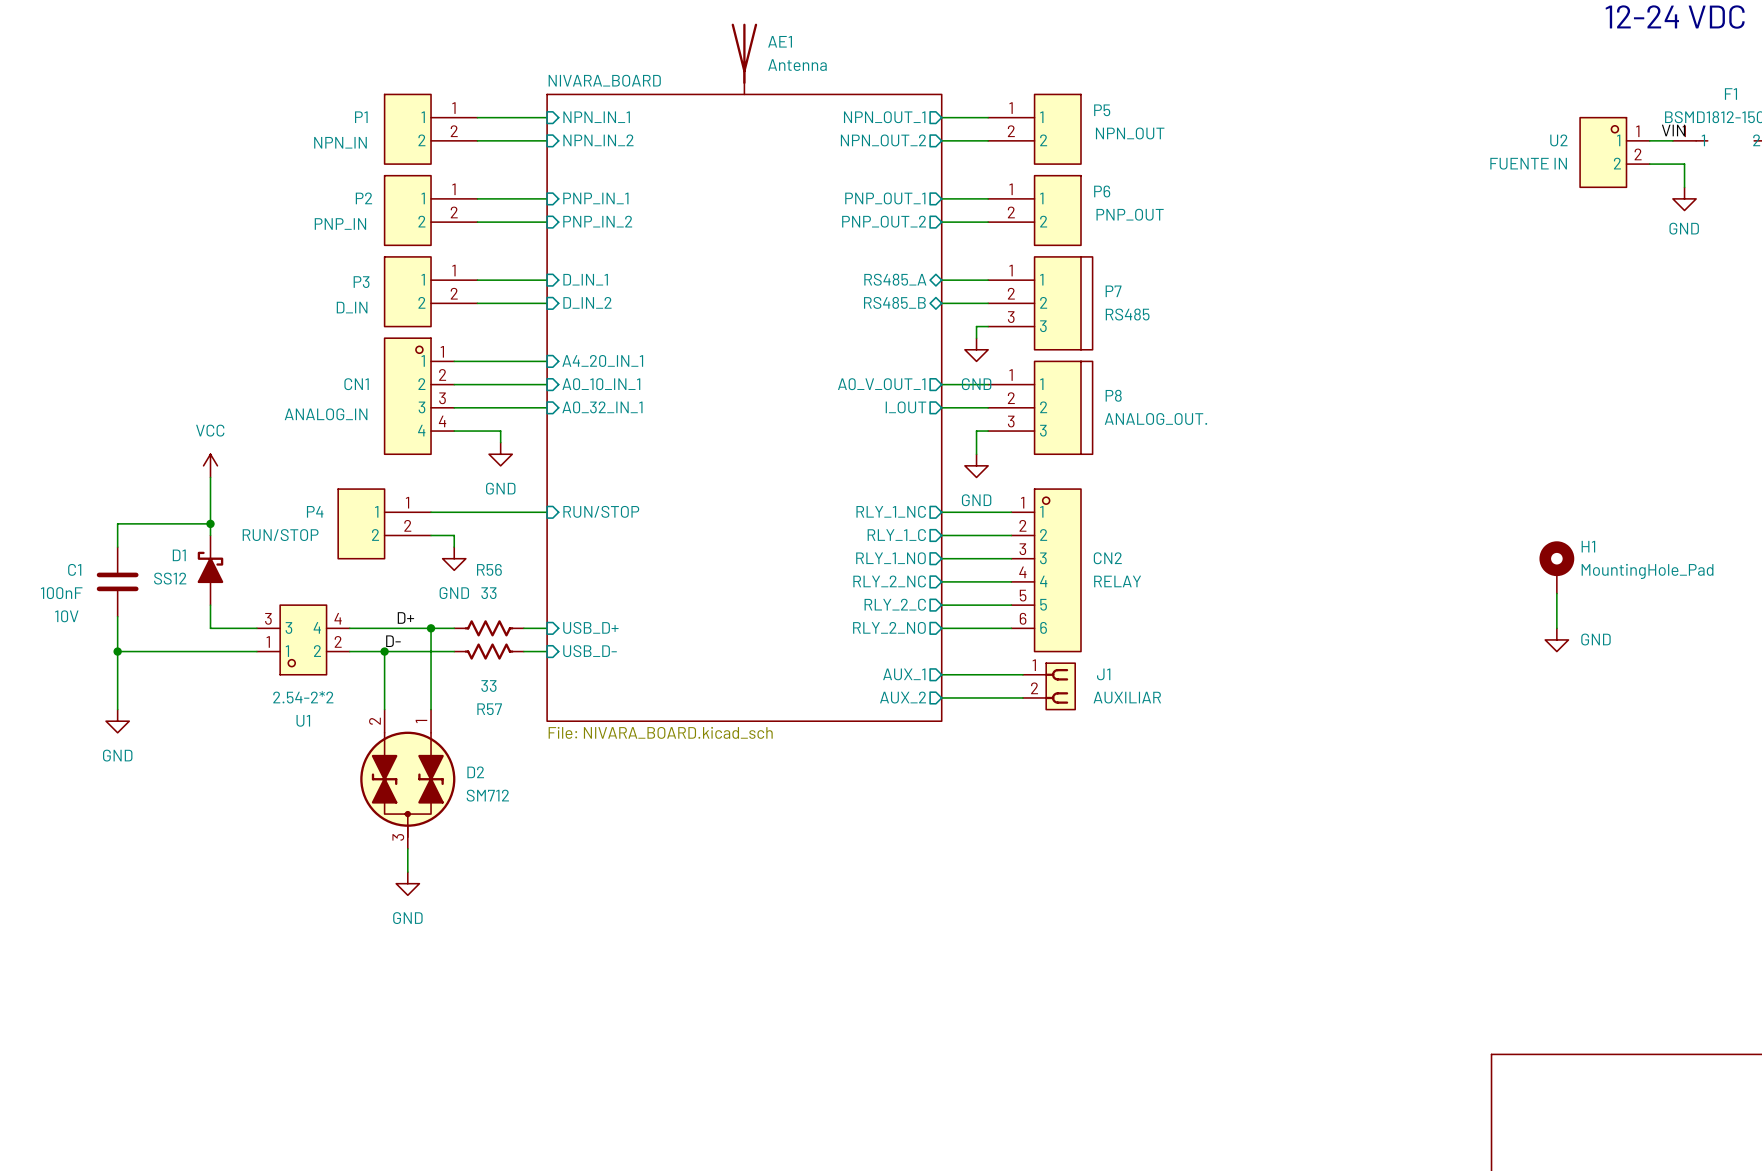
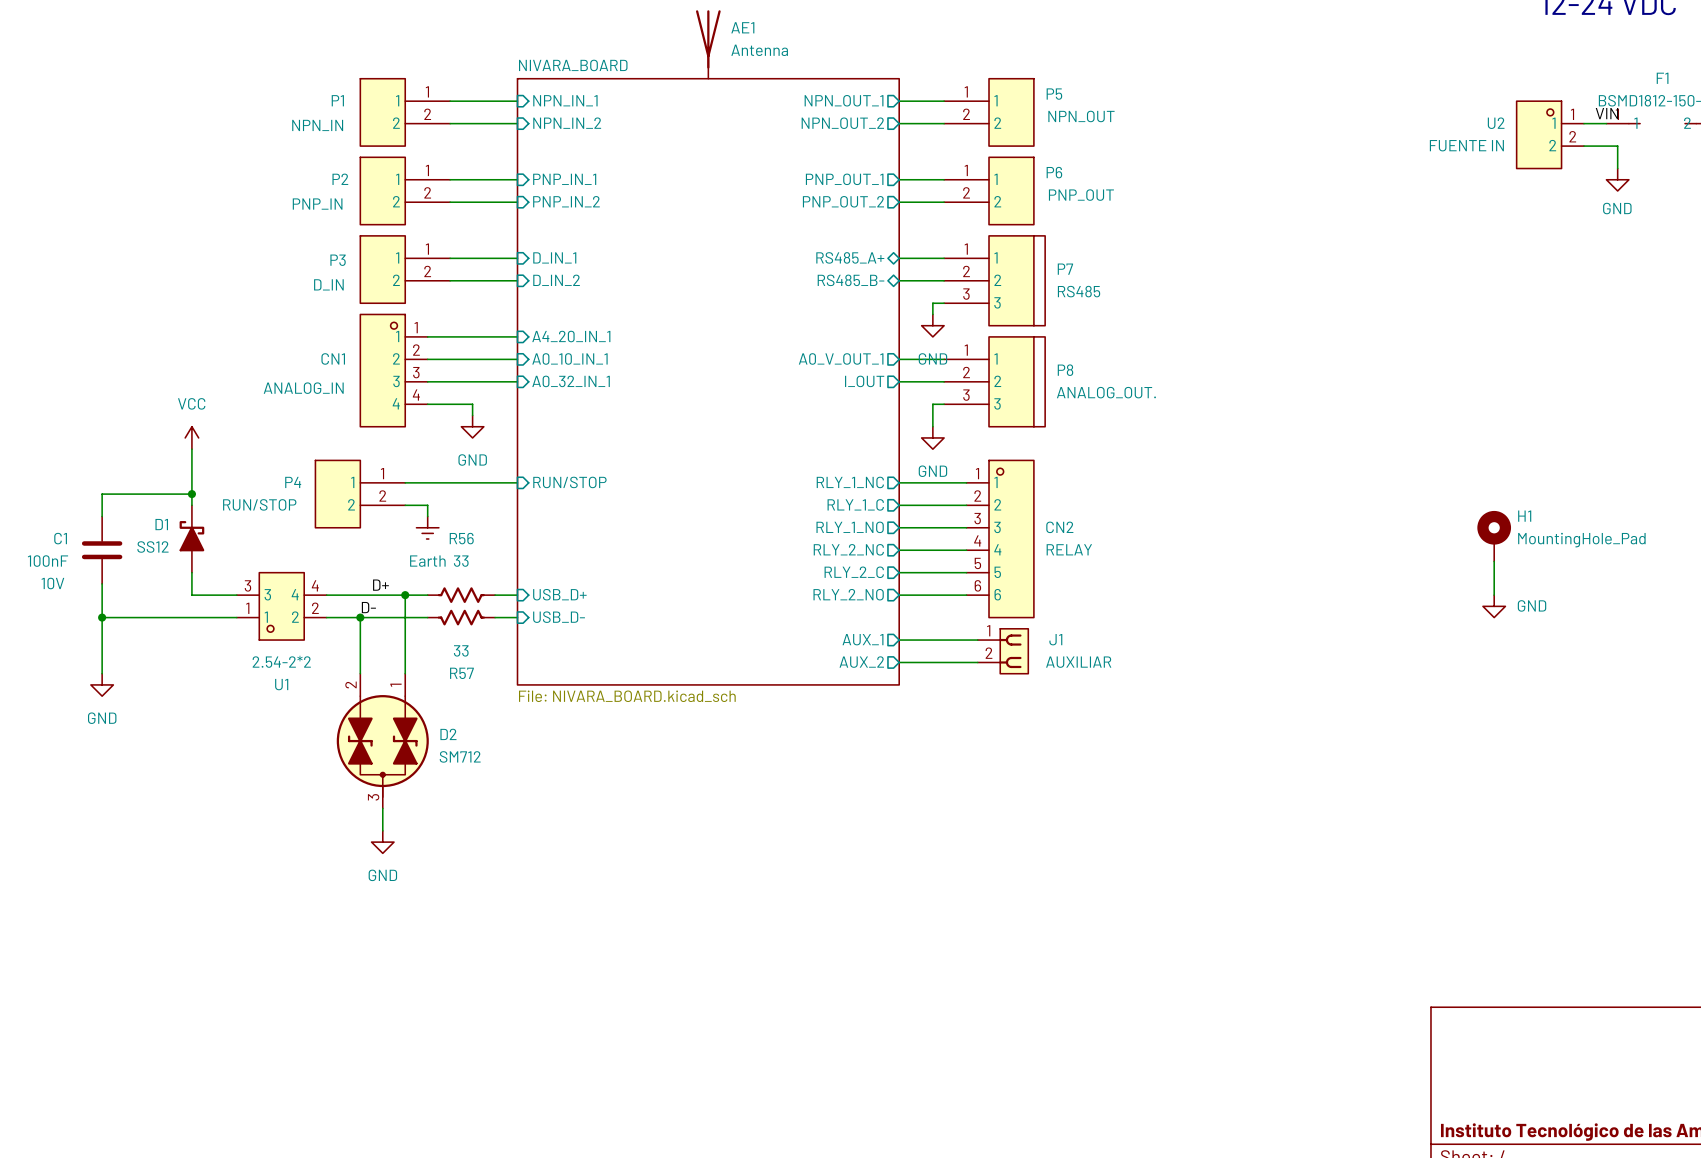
sheet pin: RS485_A (895, 279) -> RS485_A+ (850, 257)
sheet pin: RS485_B (894, 302) -> RS485_B- (851, 280)
power symbol: GND (454, 558) -> Earth (427, 527)

